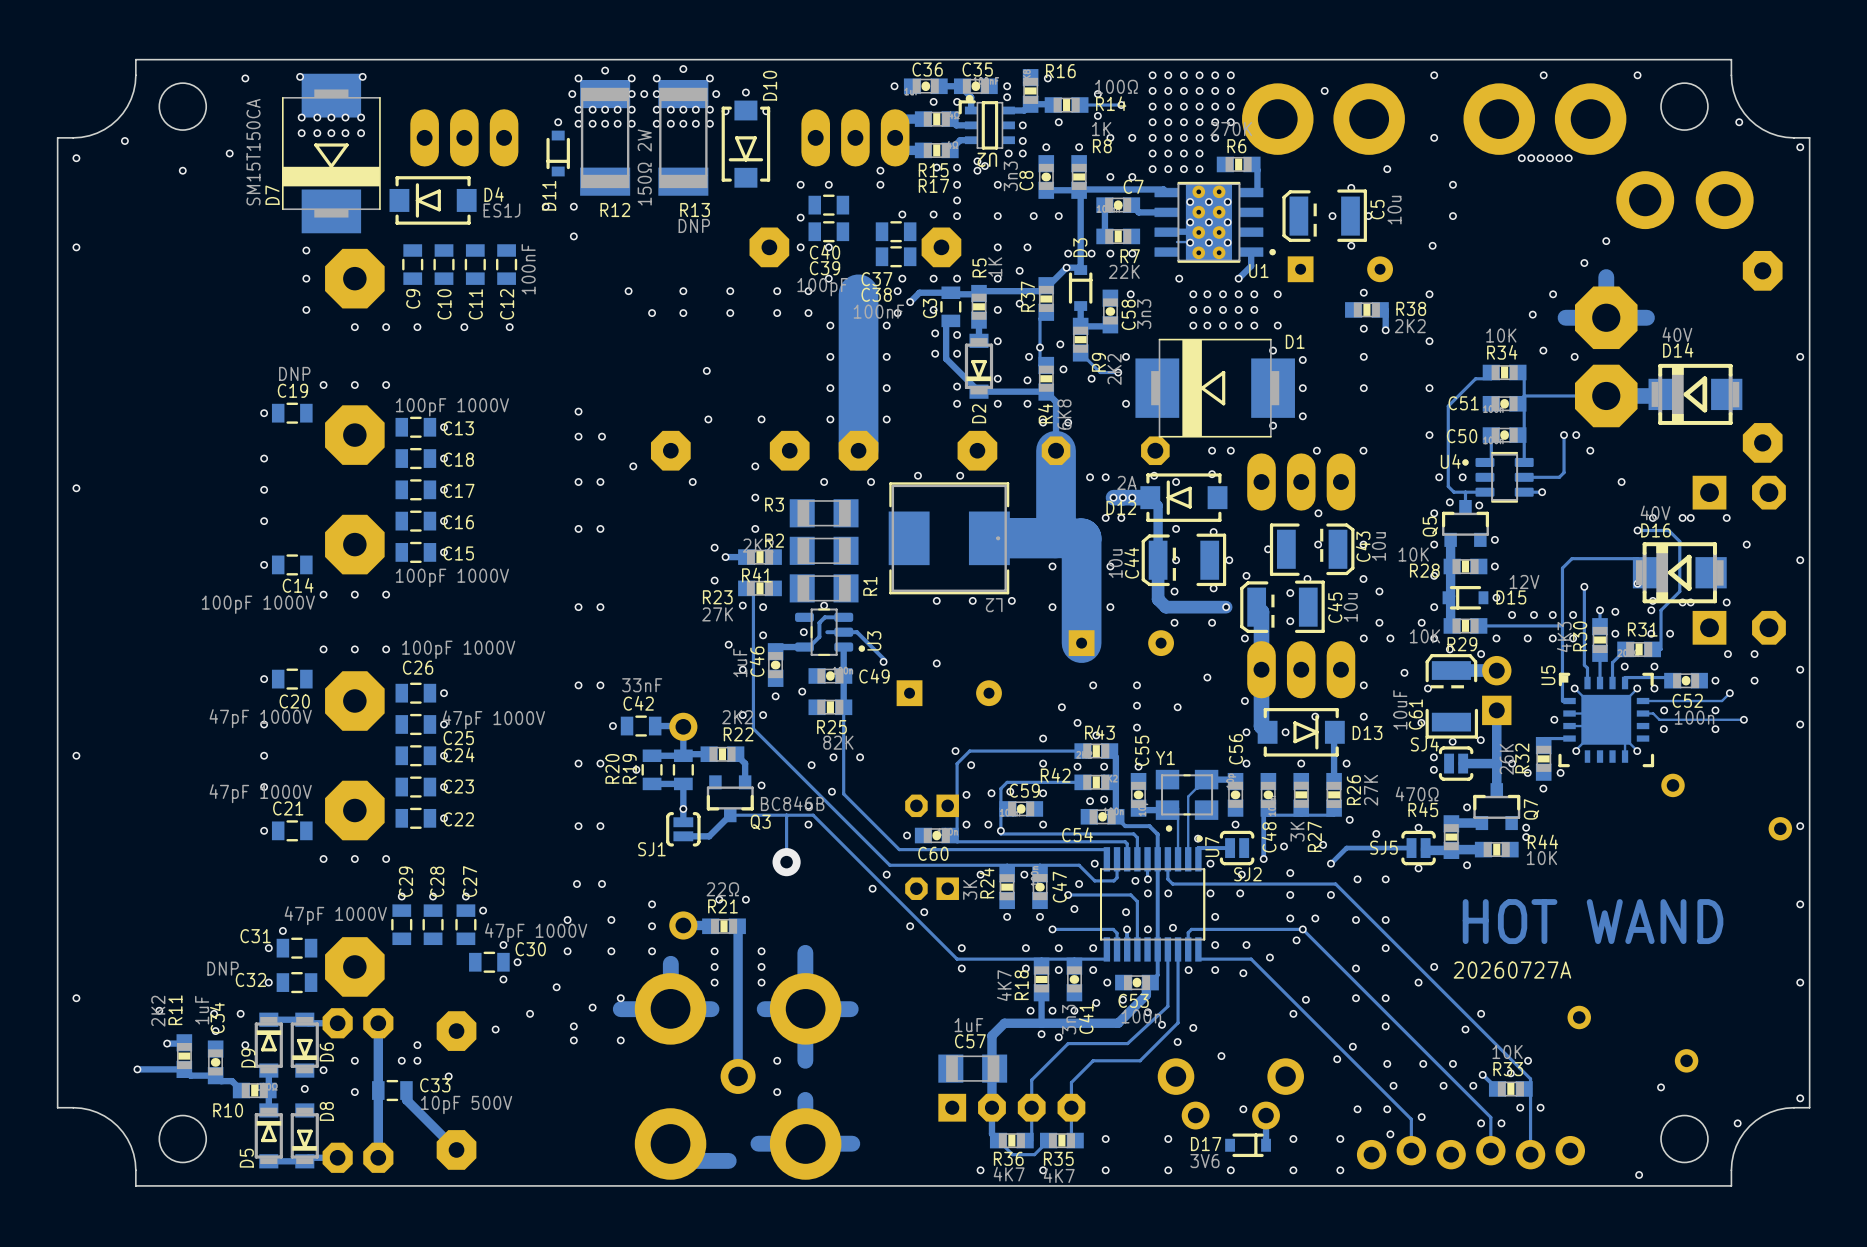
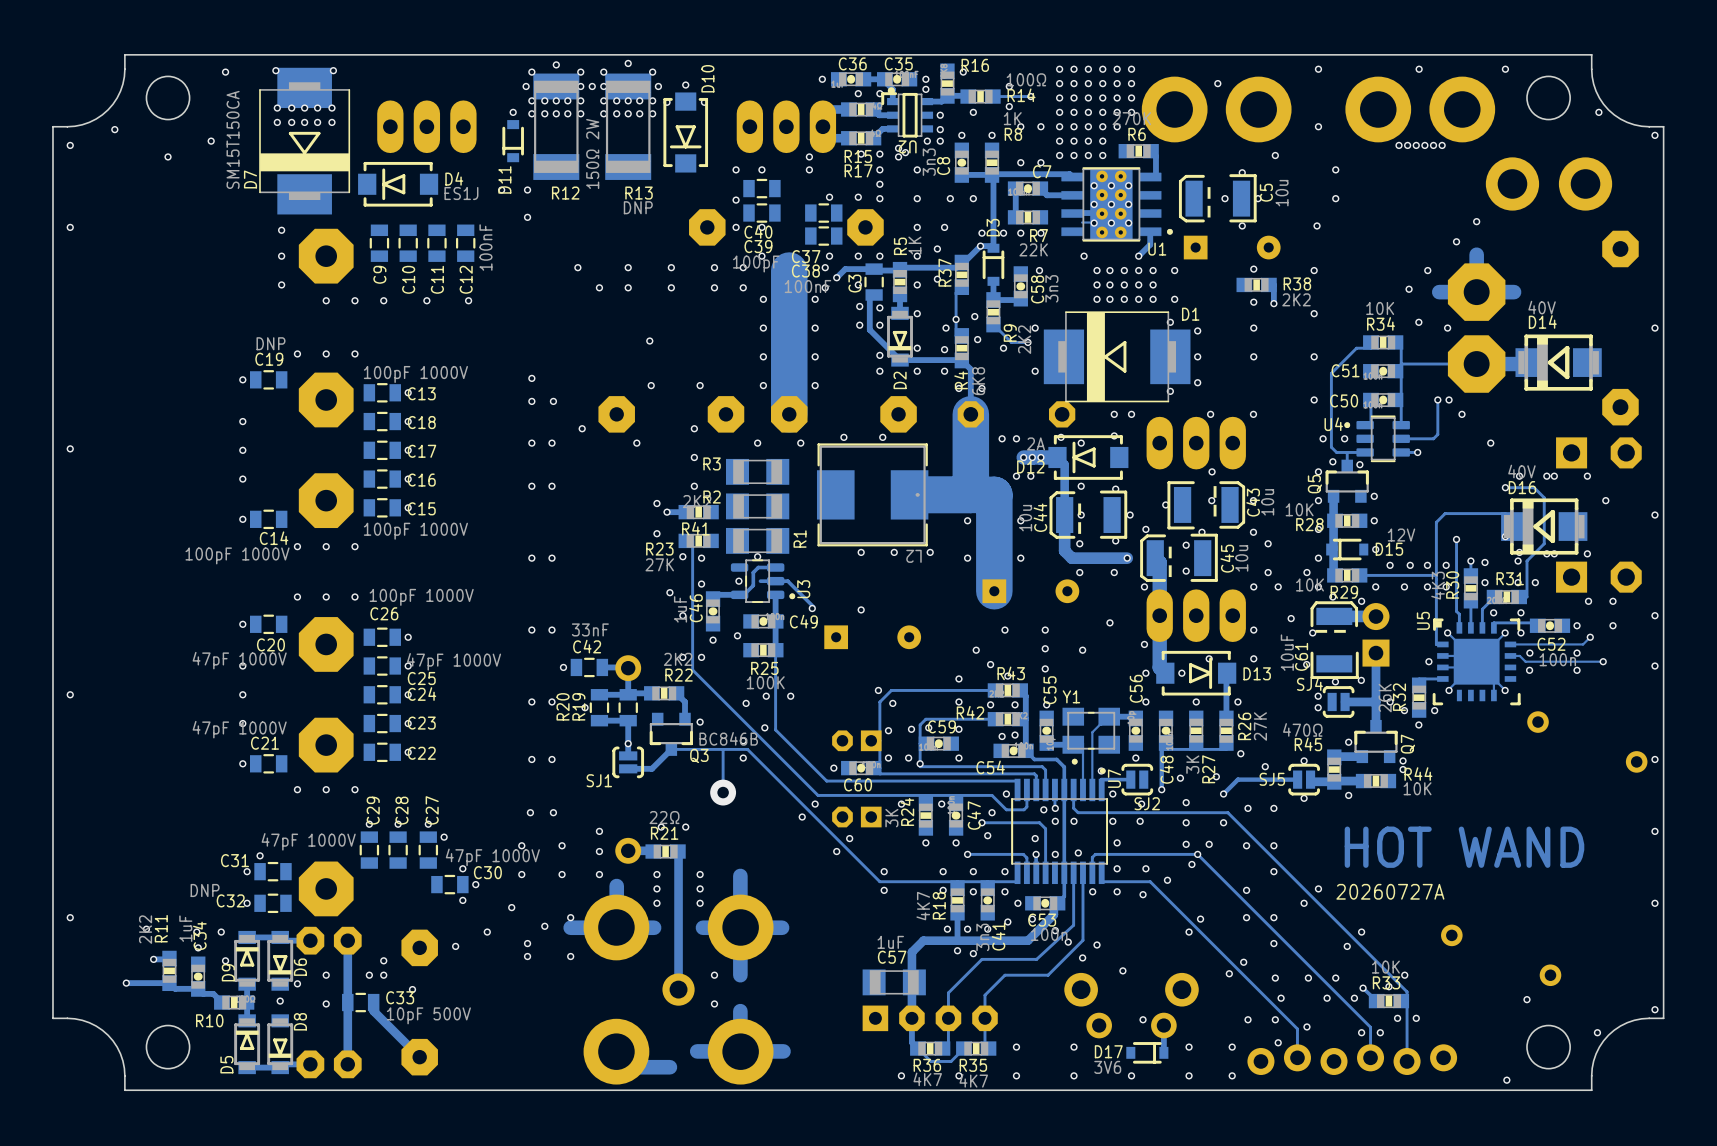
R25 value: 82K (838, 742) -> 100K (765, 682)

